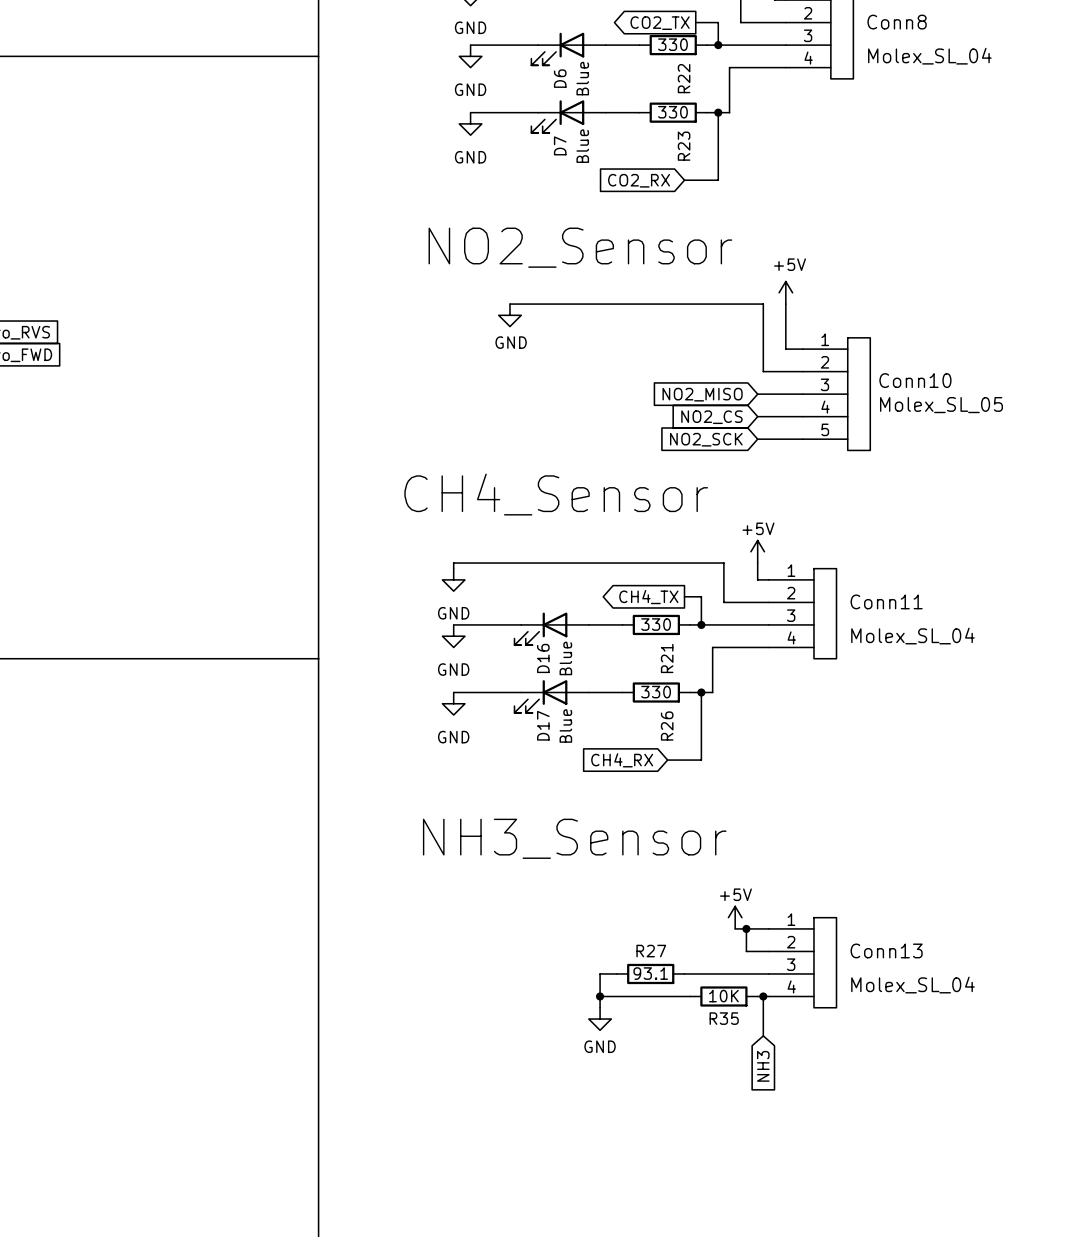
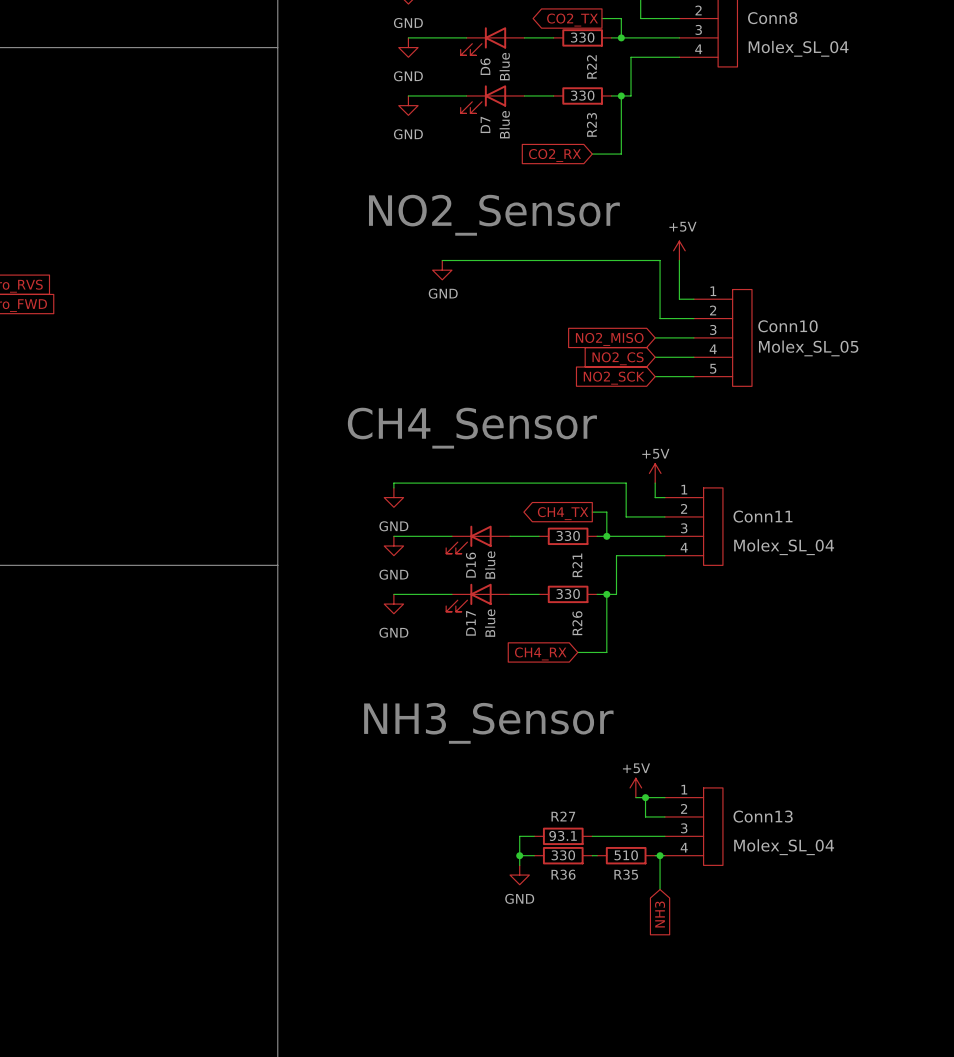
wire: (616, 996) (684, 996) -> none
R36: none -> 330 (563, 855)
R35 value: 10K (723, 996) -> 510 (626, 855)

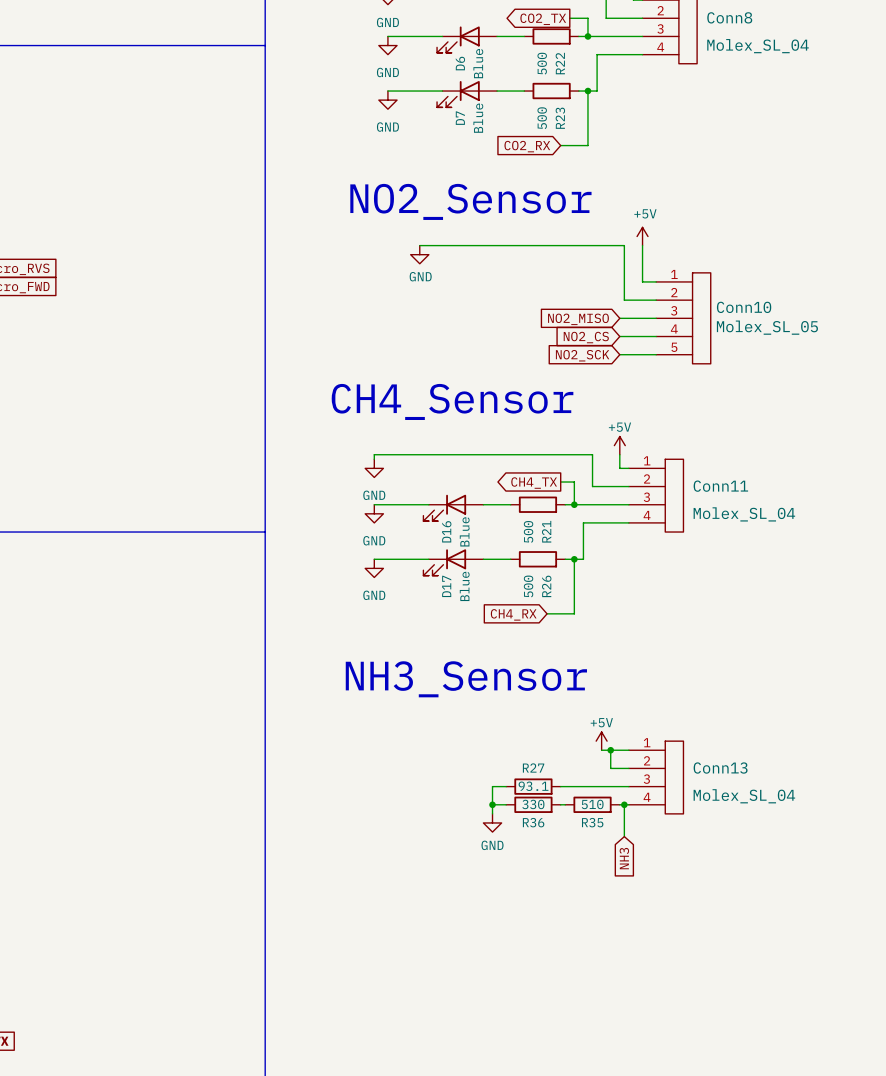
R22 value: 330 (582, 37) -> 500 (542, 63)
R23 value: 330 (582, 95) -> 500 (542, 118)
R21 value: 330 (568, 535) -> 500 (528, 531)
R26 value: 330 (568, 594) -> 500 (528, 586)

